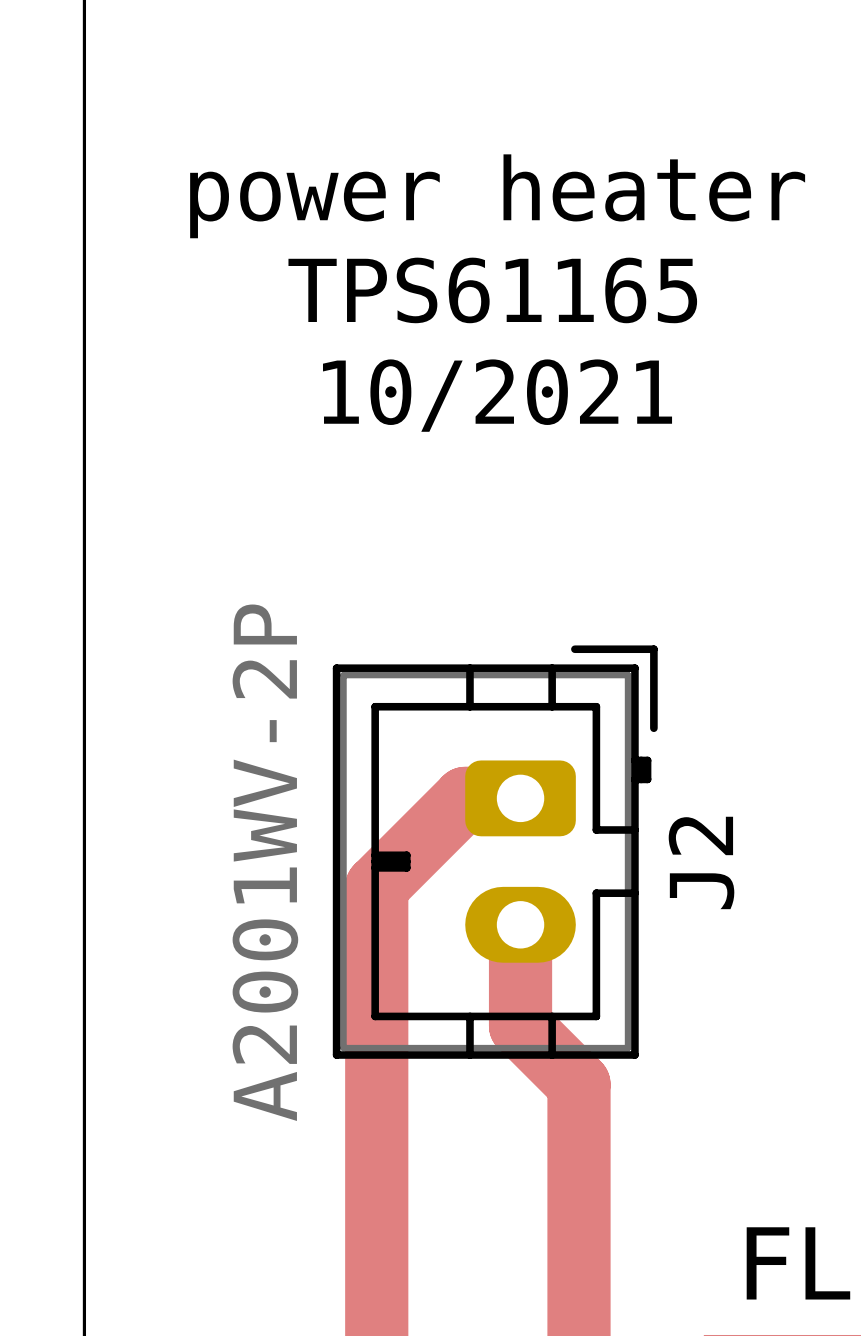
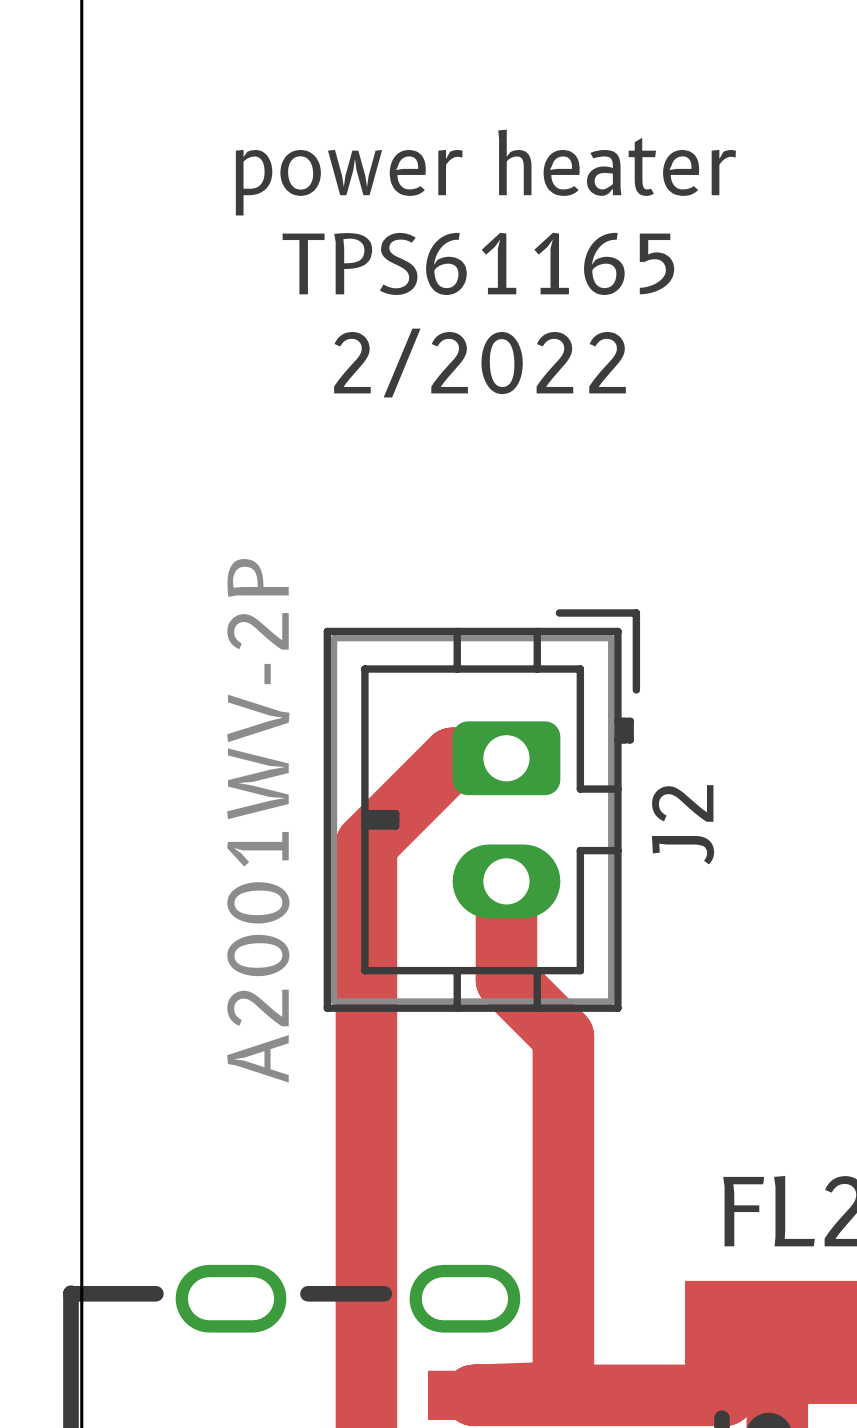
text: 10/2021 (497, 395) -> 2/2022 (479, 363)

